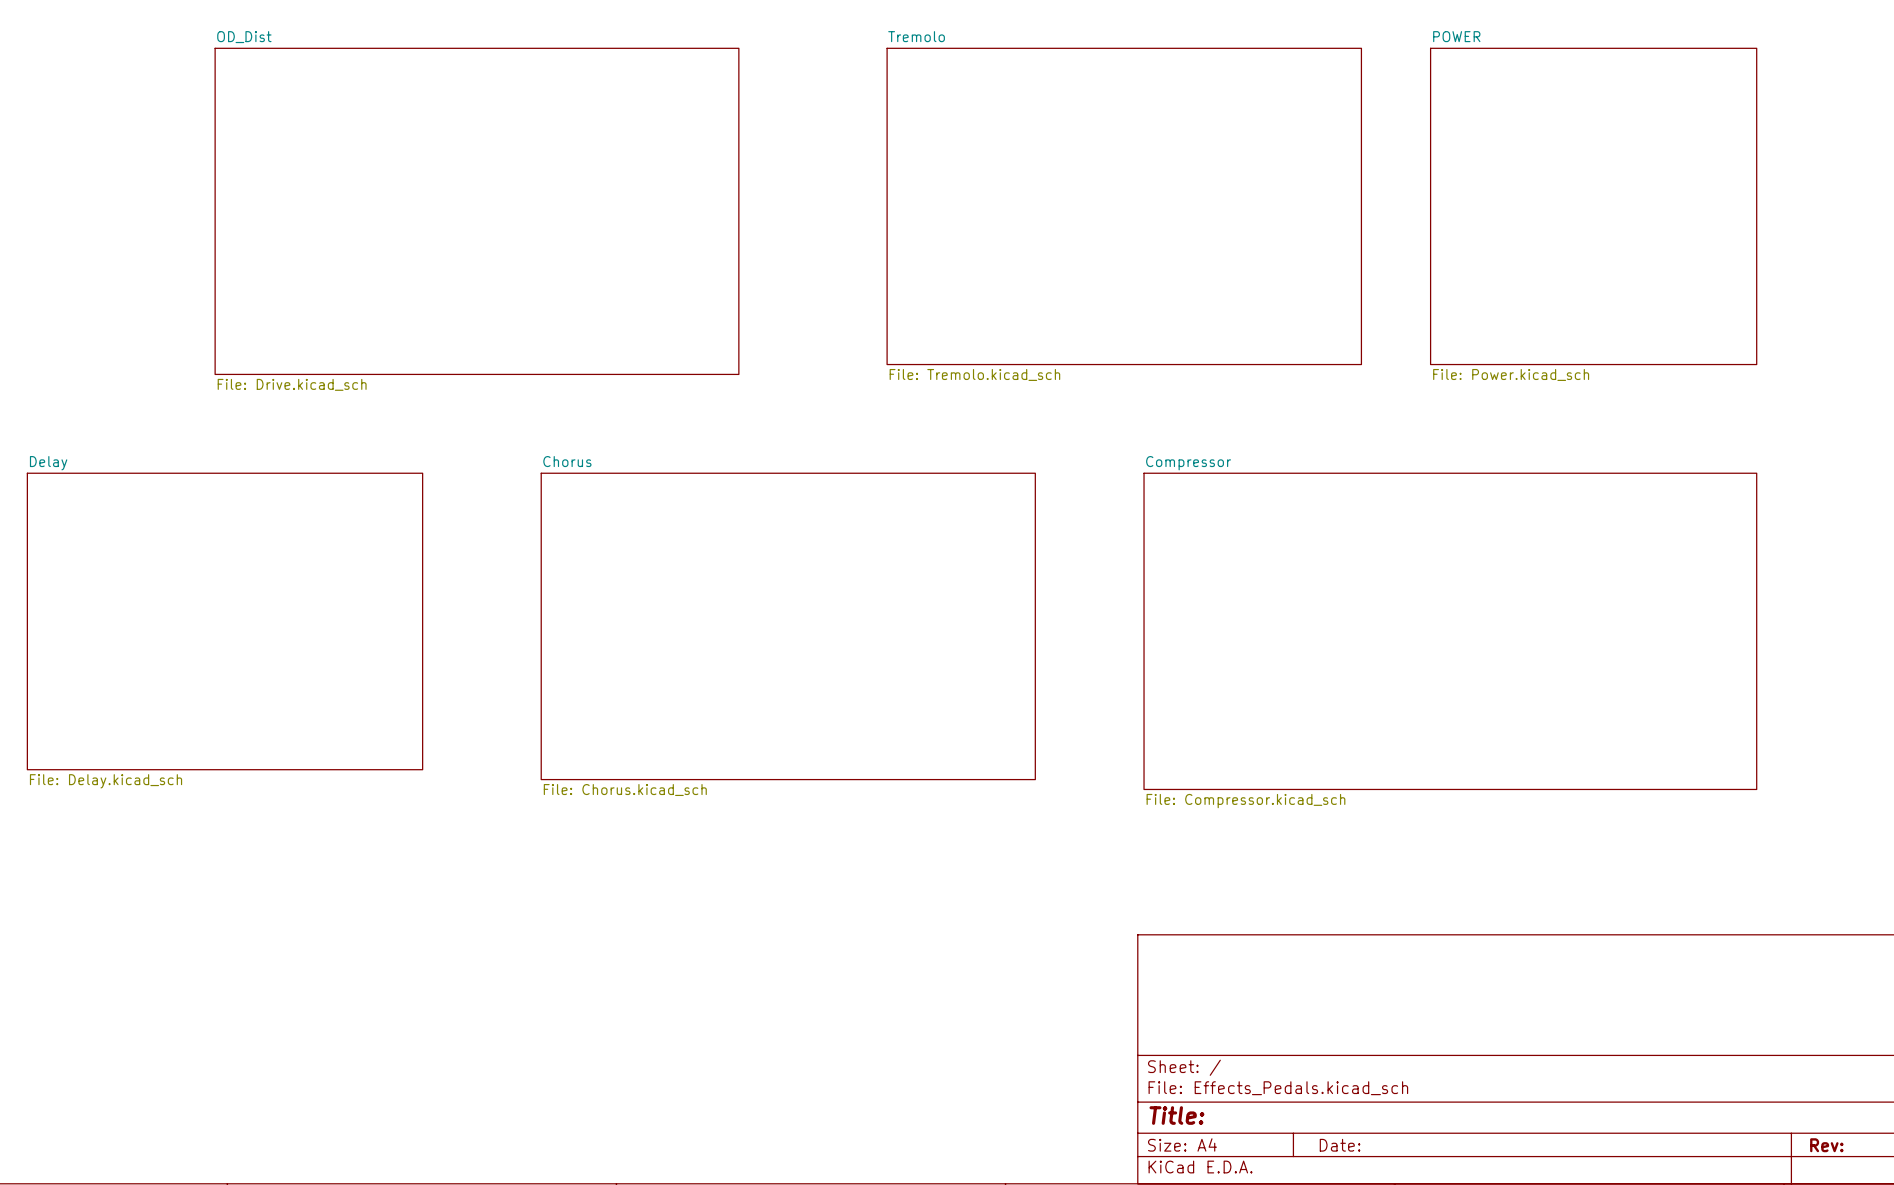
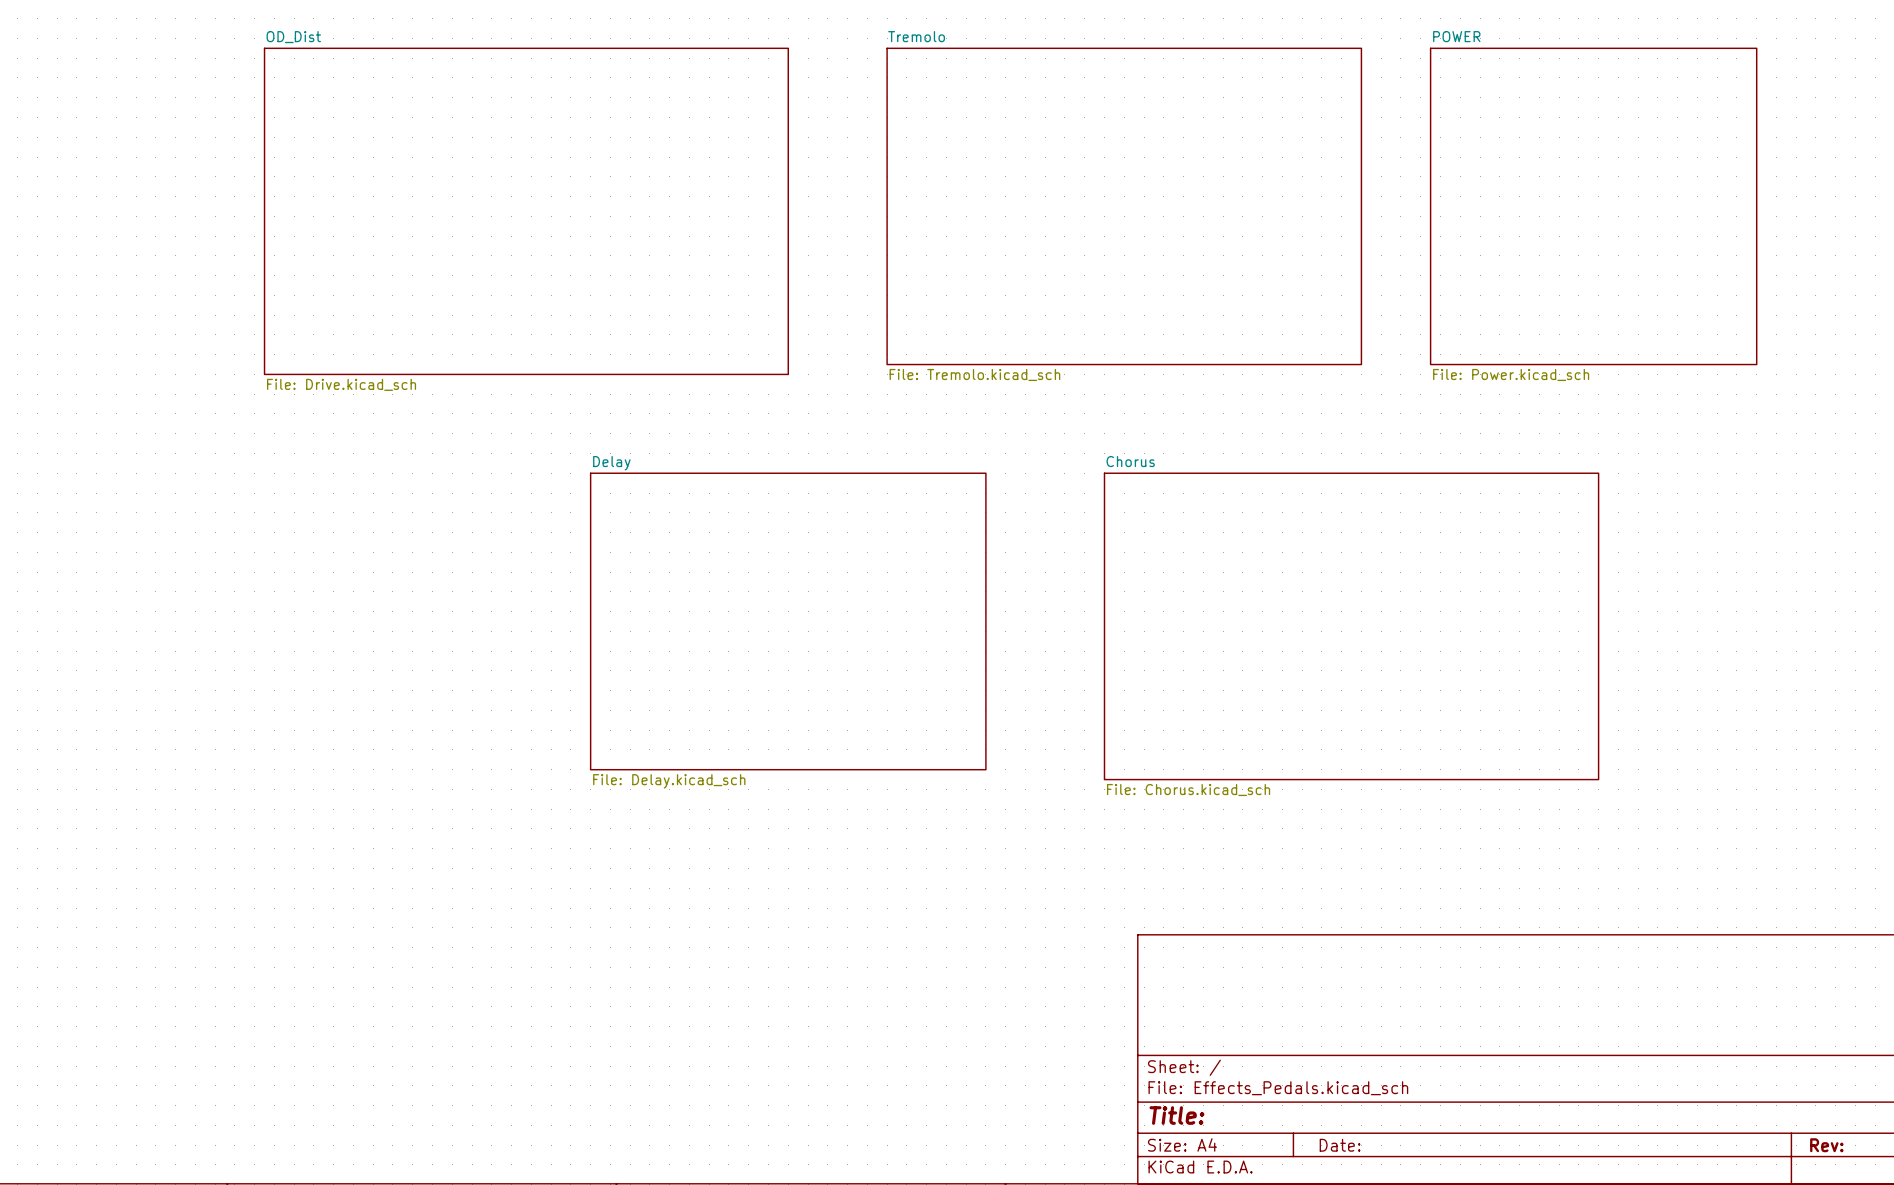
sheet OD_Dist position: (476, 211) -> (526, 211)
sheet Delay: File: Delay.kicad_sch (225, 621) -> none
sheet Delay: none -> File: Delay.kicad_sch (788, 621)
sheet Chorus: File: Chorus.kicad_sch (788, 626) -> none
sheet Chorus: none -> File: Chorus.kicad_sch (1351, 626)
sheet Compressor: File: Compressor.kicad_sch (1450, 631) -> none

